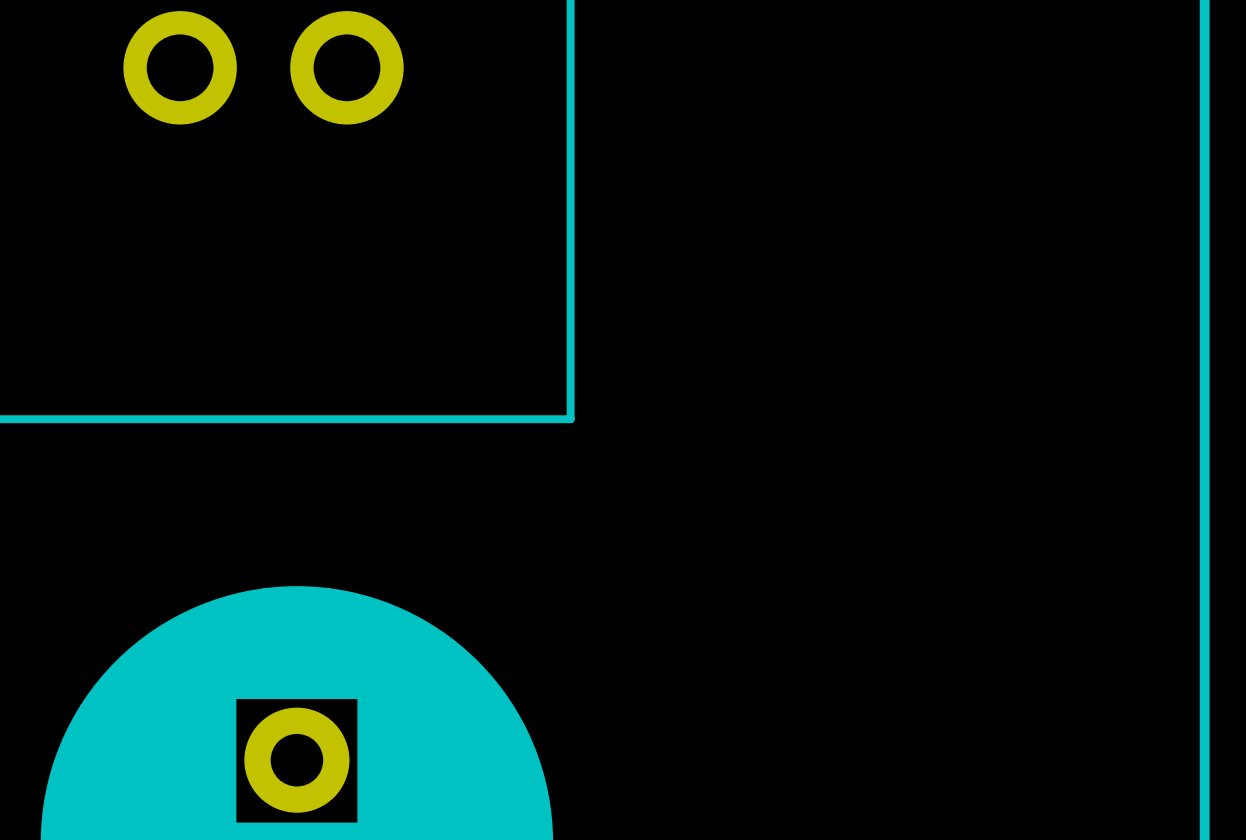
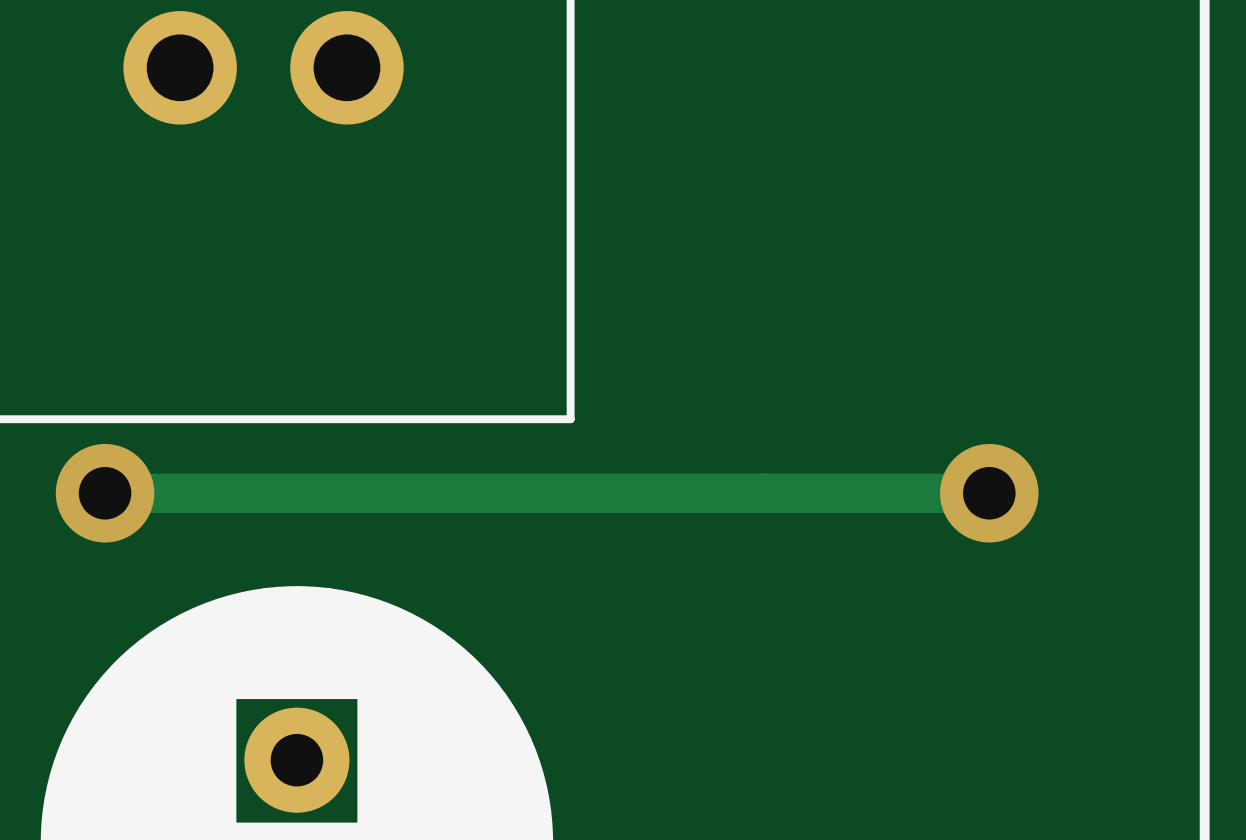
via: none -> (105, 493)
track: none -> (146, 493) (964, 493)
via: none -> (989, 493)

